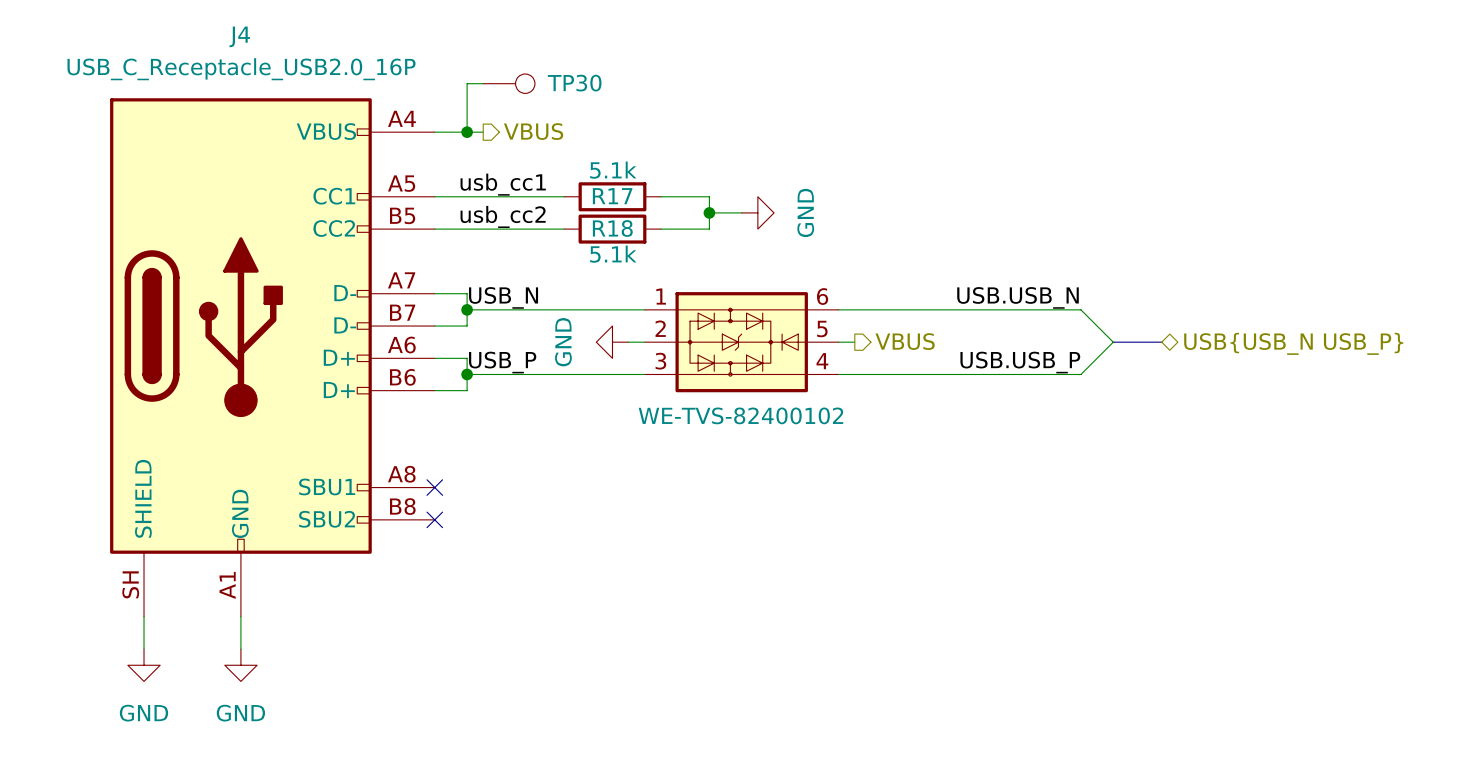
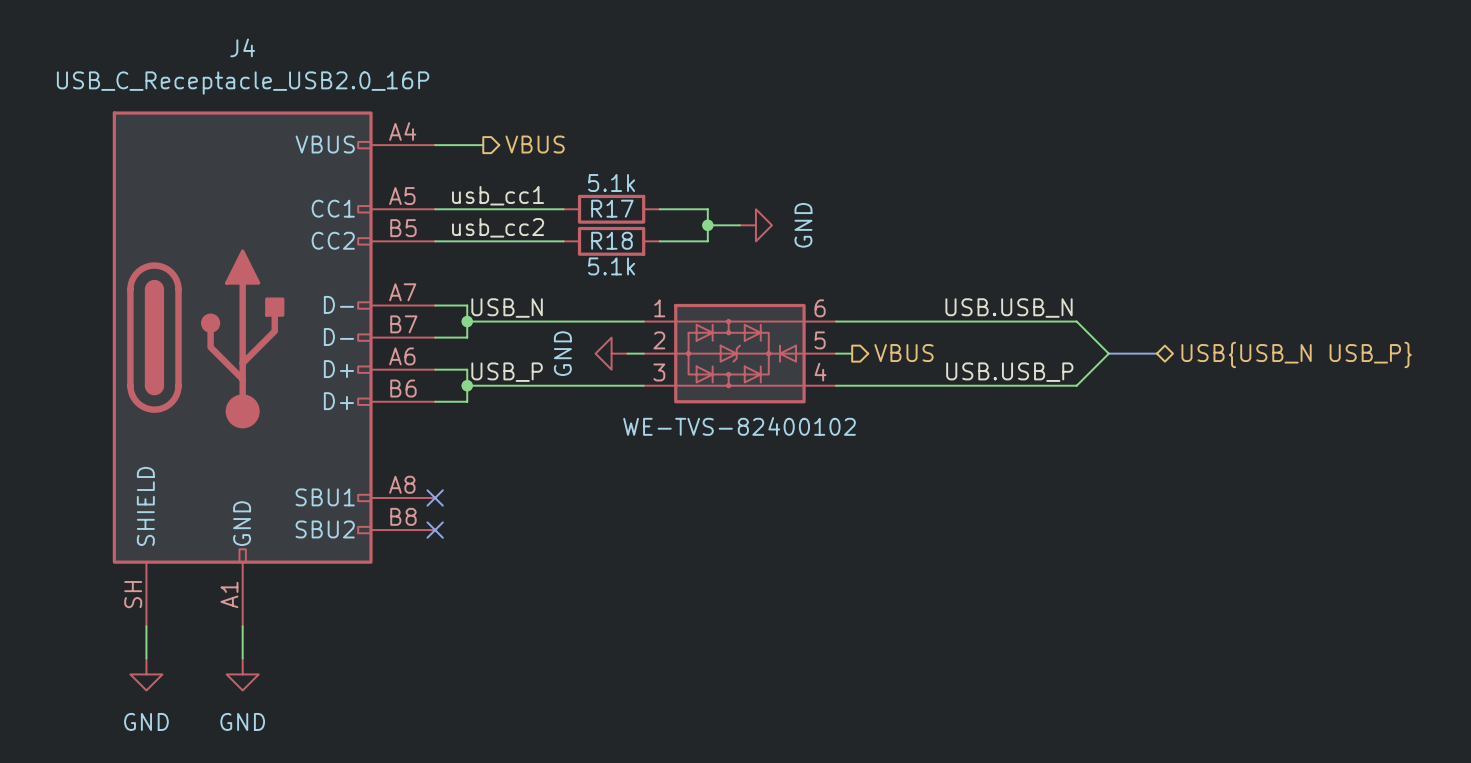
wire: (483, 83) (467, 83) (467, 132) -> none
TP30: (509, 83) -> none
junction: (467, 132) -> none

